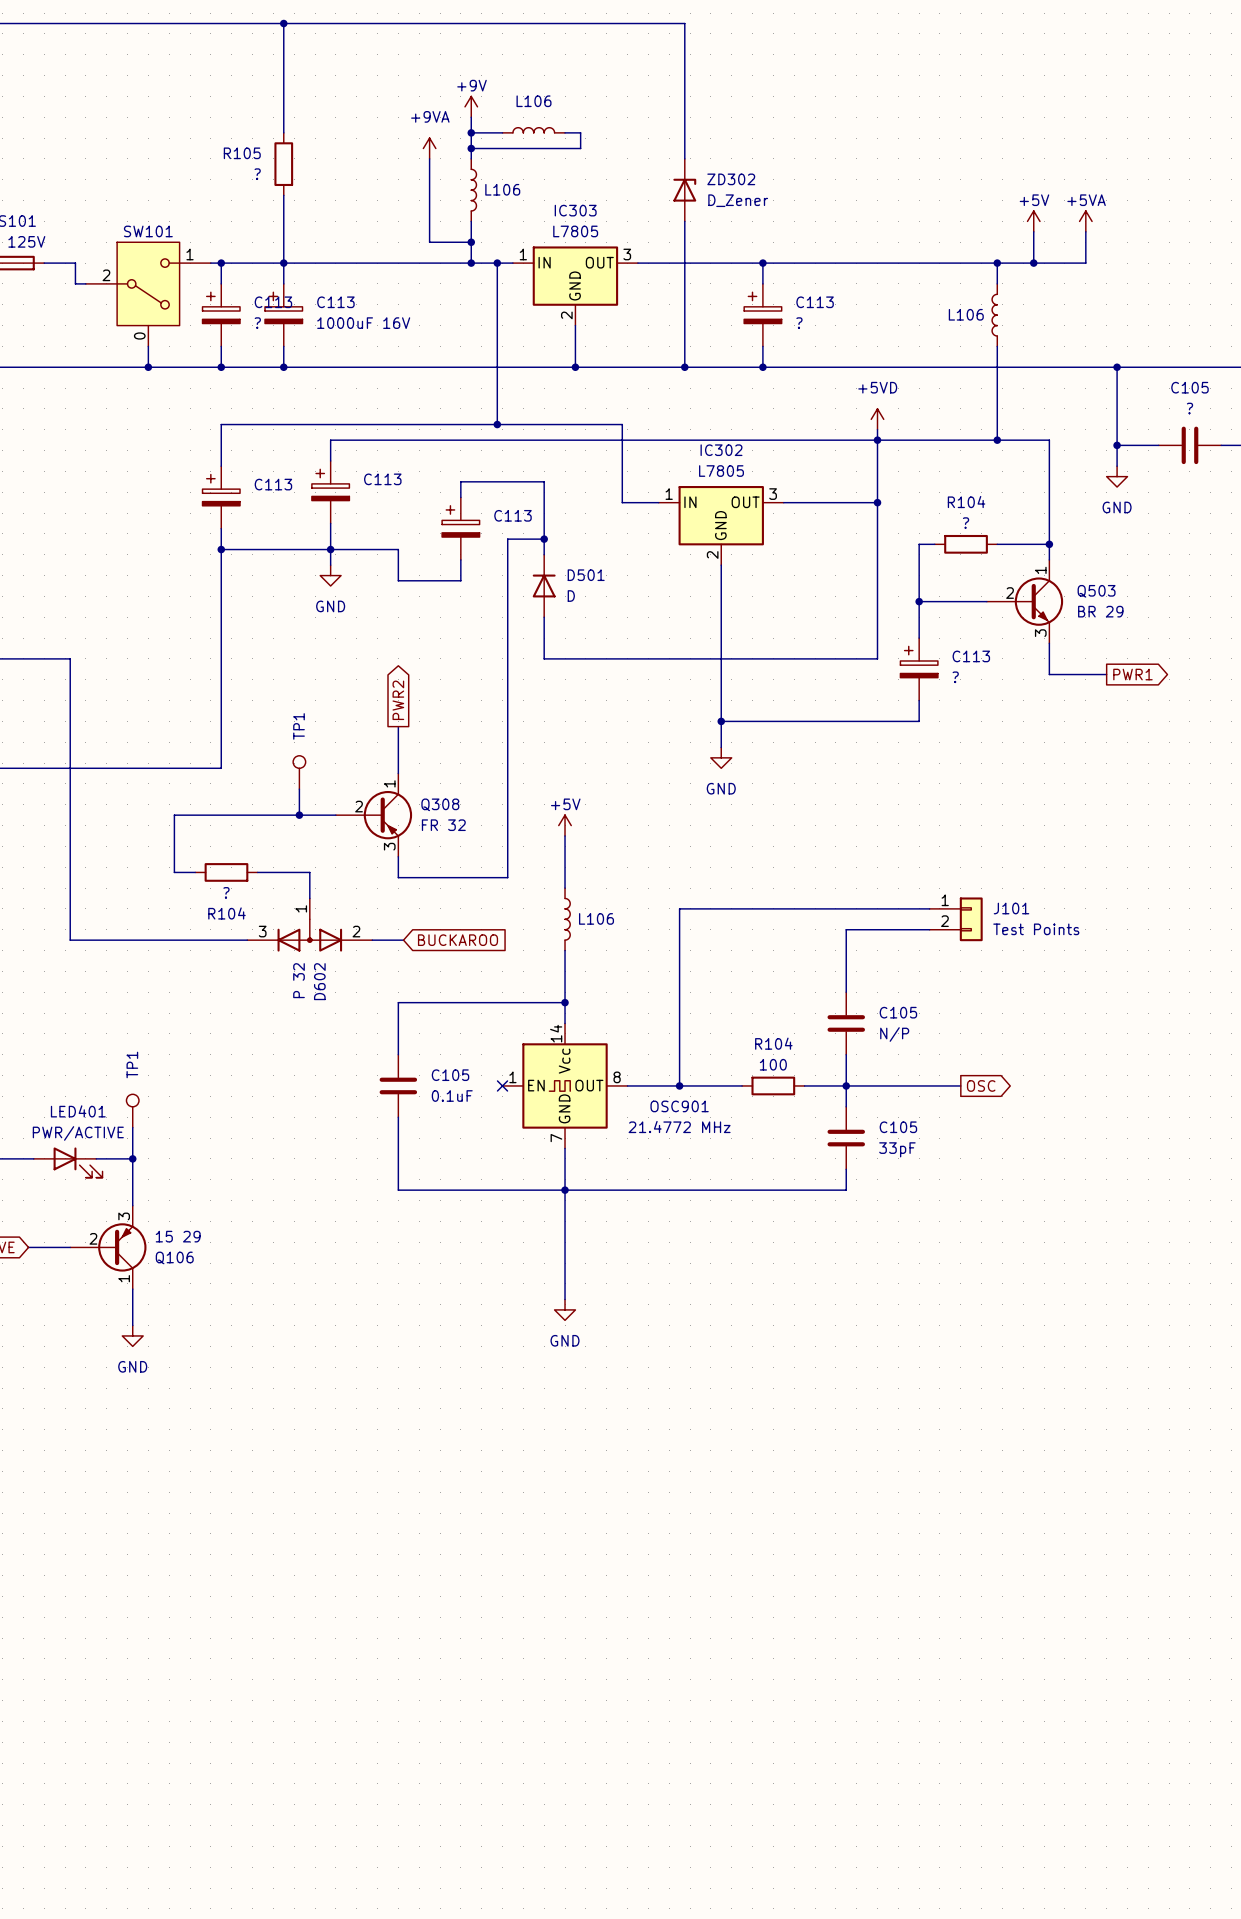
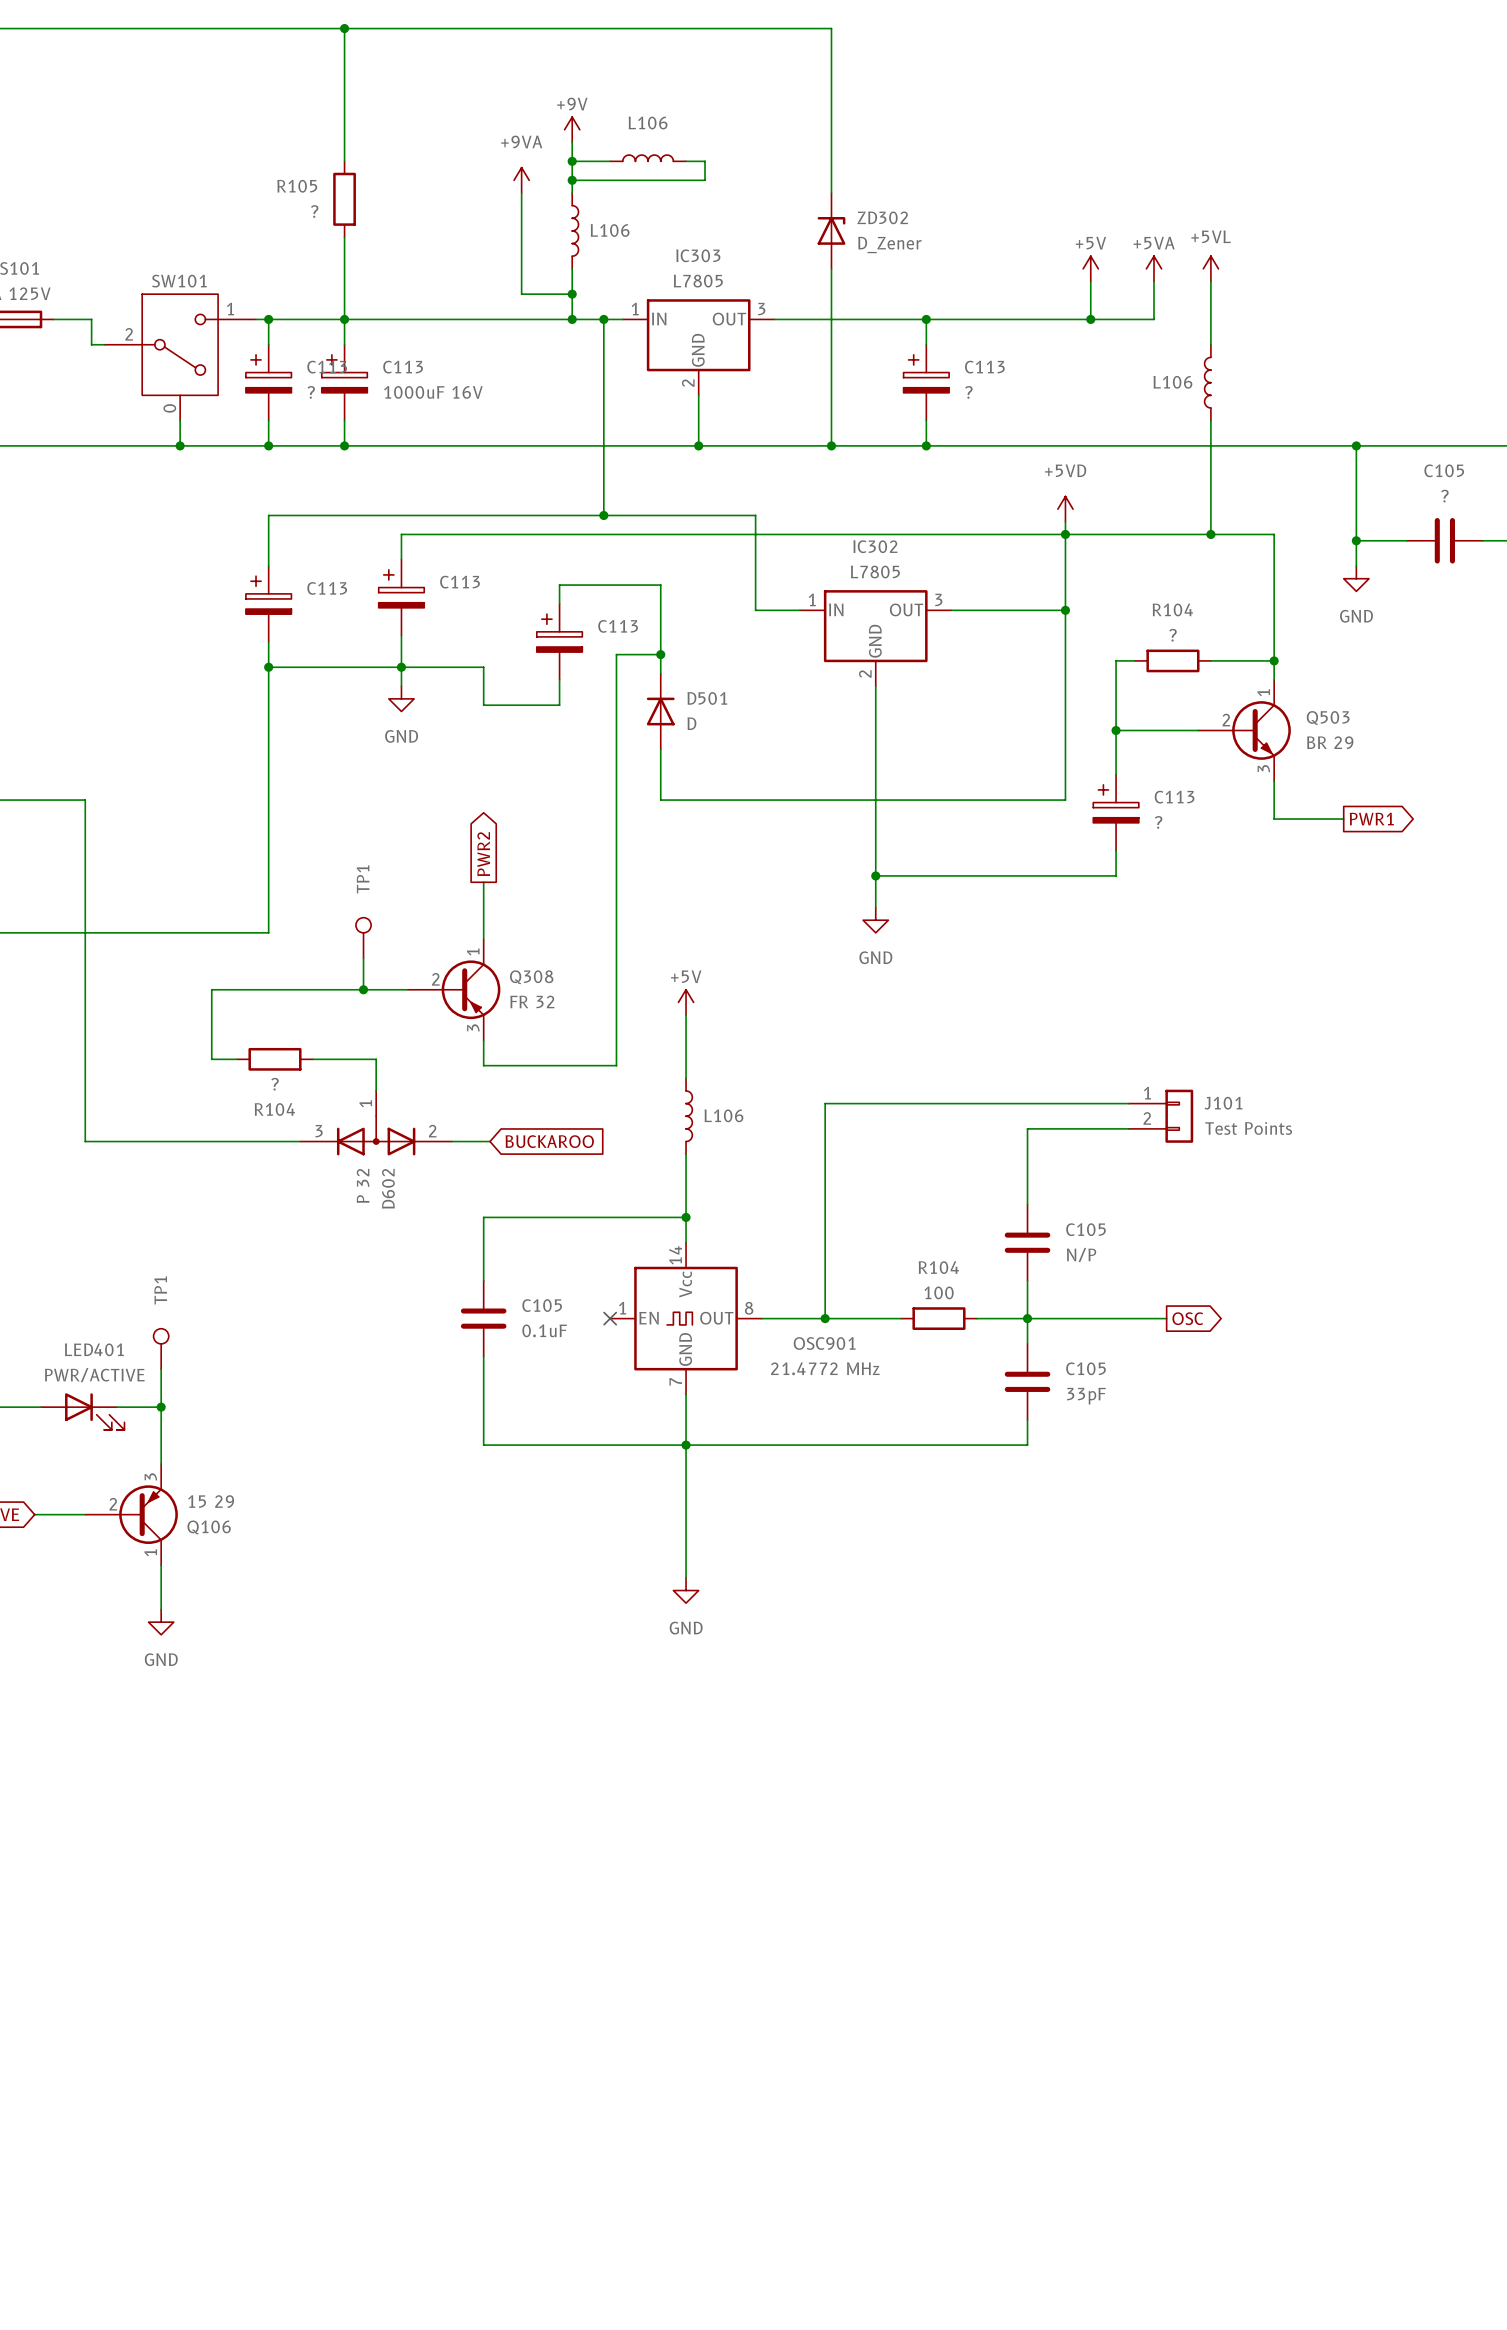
power symbol: none -> +5VL (1210, 268)
power symbol position: +5V (1033, 221) -> +5V (1090, 268)
power symbol position: +5VA (1085, 221) -> +5VA (1154, 268)
wire: none -> (1090, 281) (1090, 319)
wire: (1033, 231) (1033, 263) -> (1210, 281) (1210, 319)
wire: (1085, 231) (1085, 263) (950, 263) -> (1154, 281) (1154, 319)
junction: none -> (1090, 319)
junction: (997, 263) -> none
junction: (1033, 263) -> none

